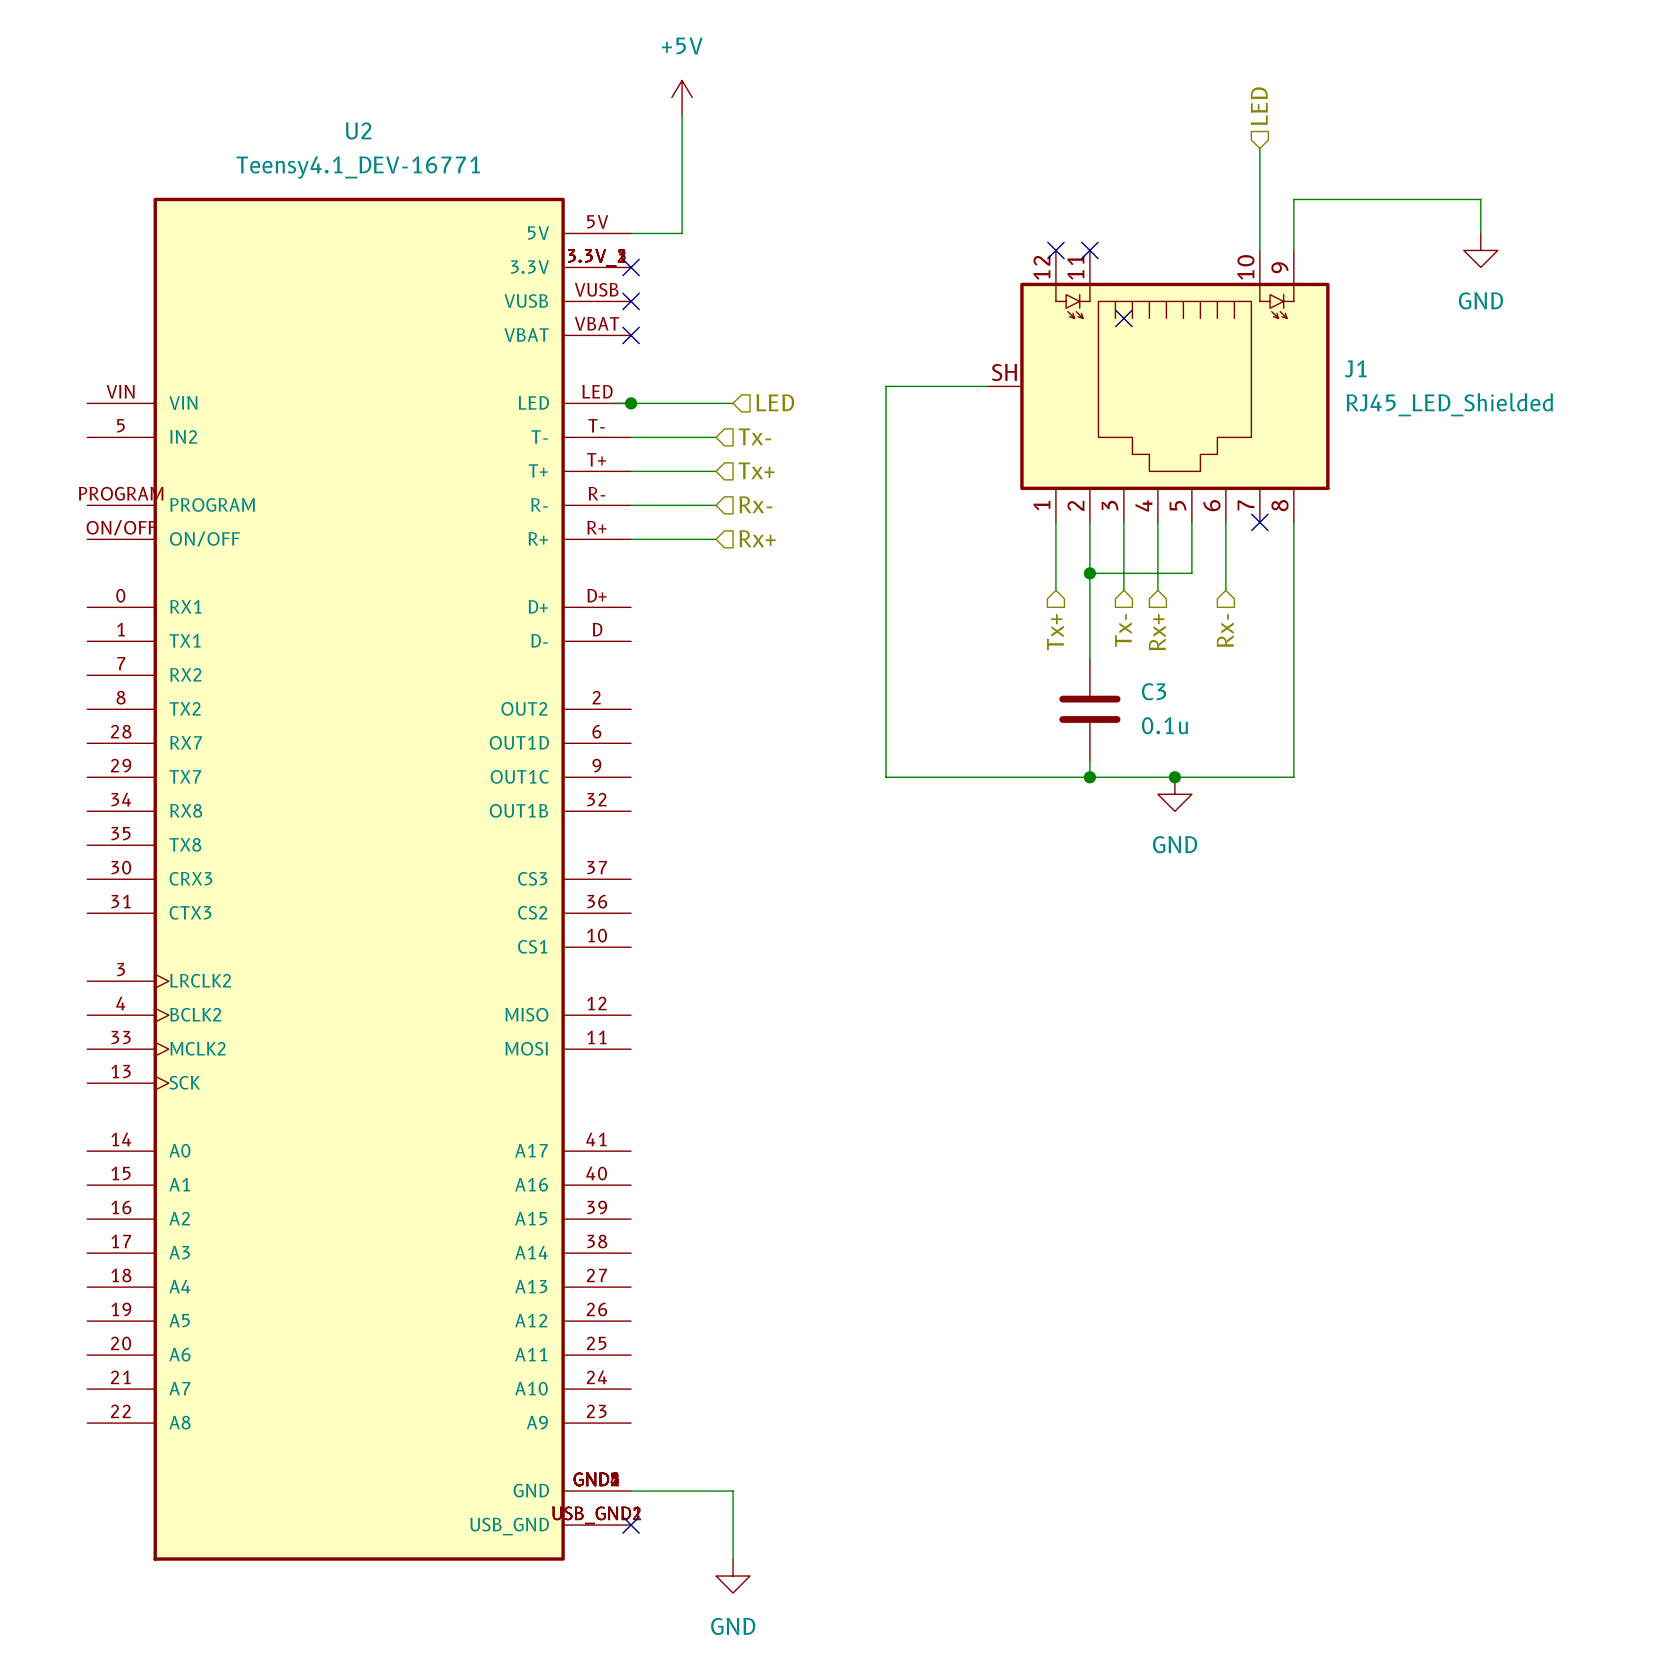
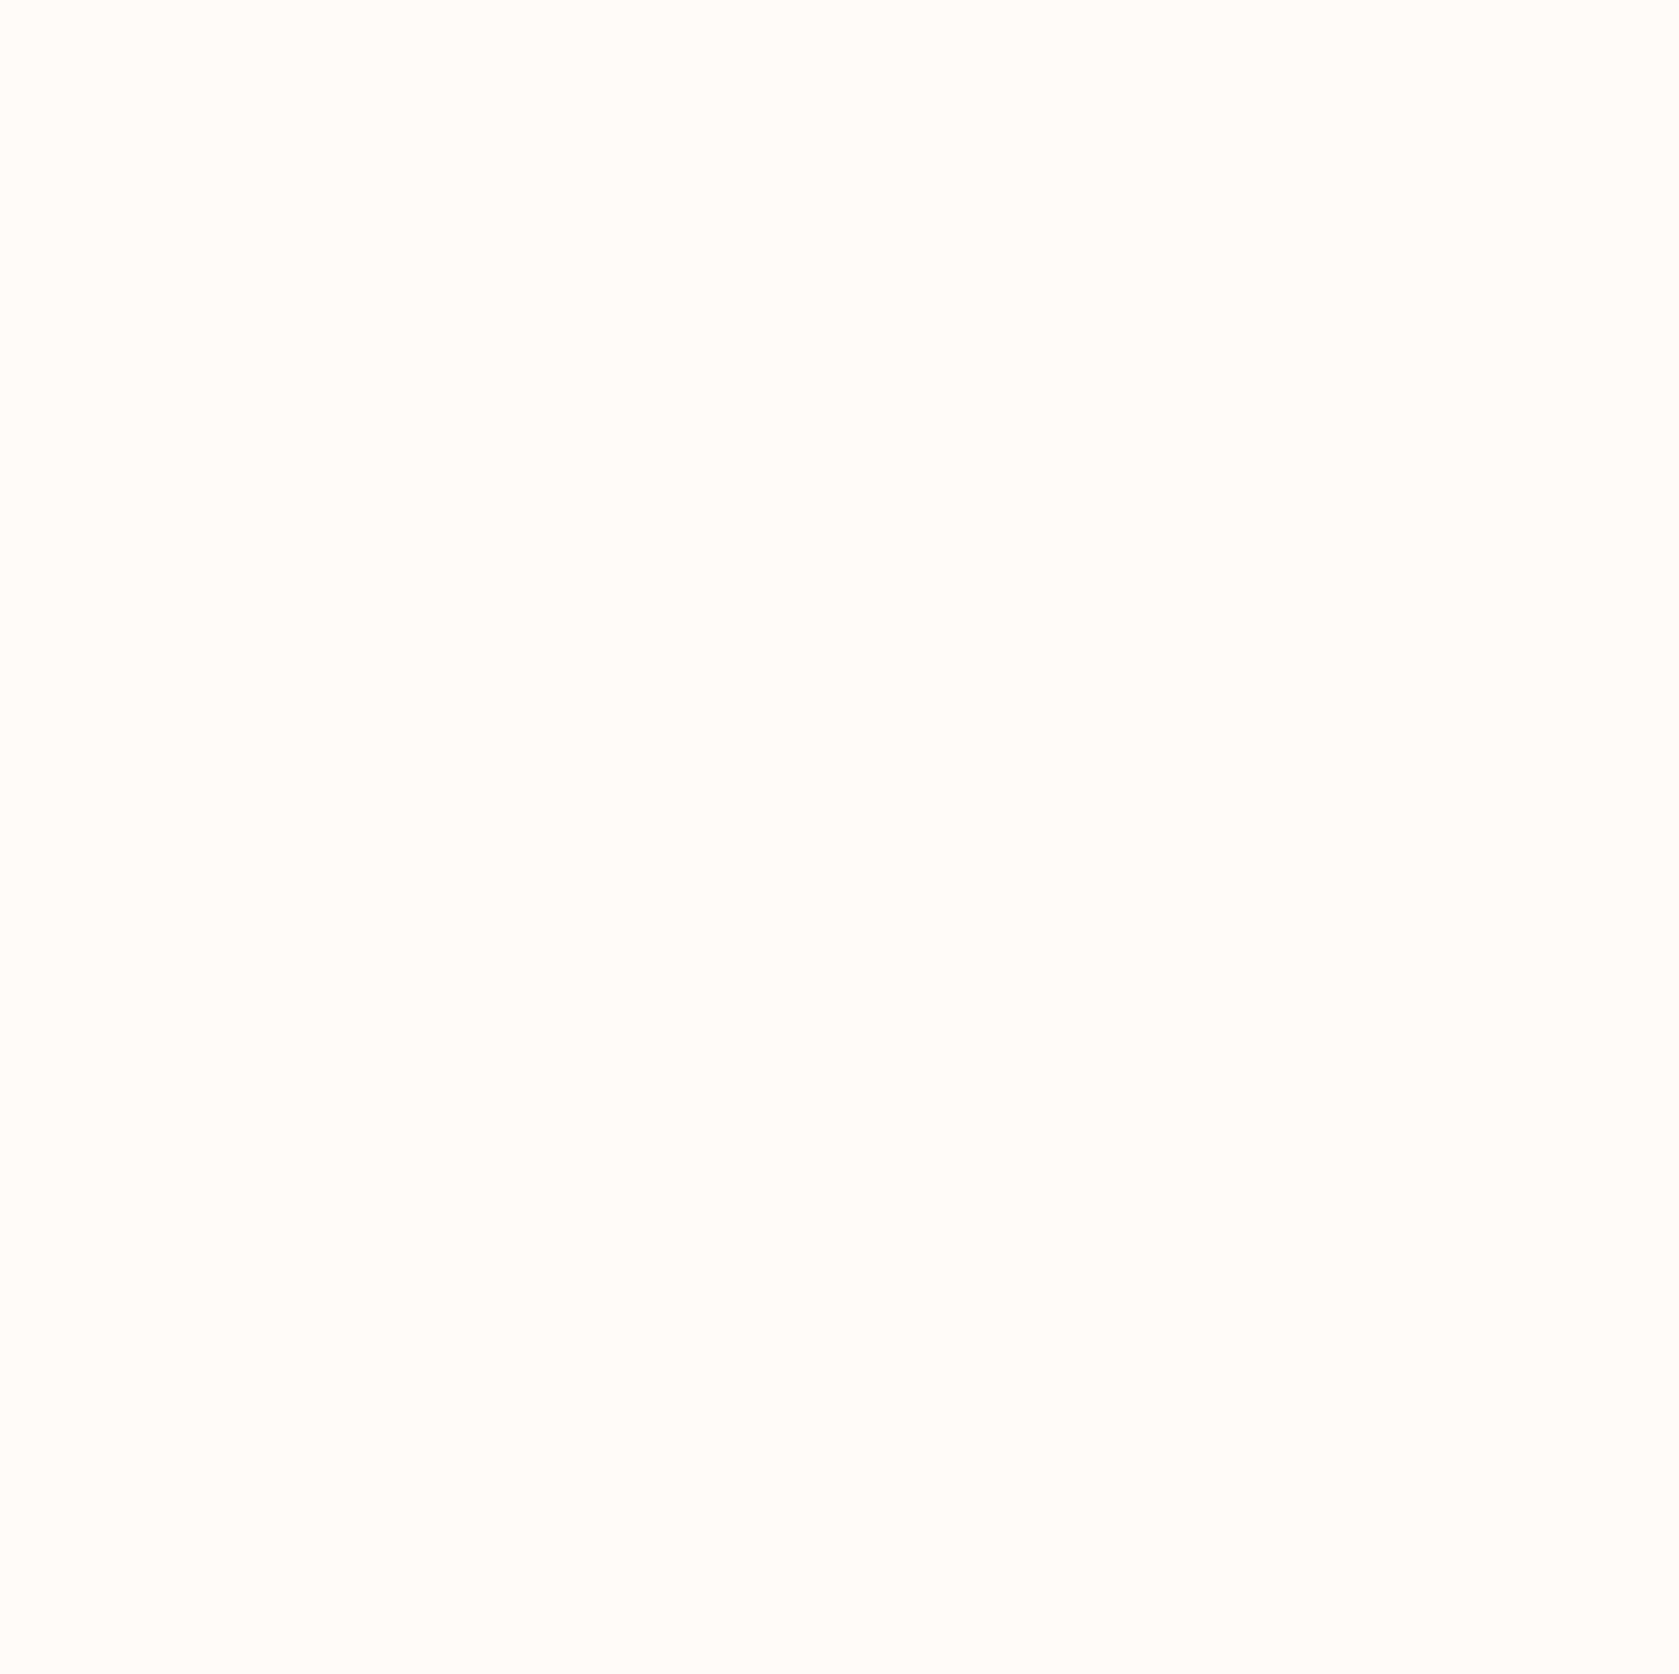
power symbol: +5V (682, 97) -> none
hierarchical label: LED (1259, 106) -> none
wire: (682, 114) (682, 233) (631, 233) -> none
wire: (1259, 148) (1259, 250) -> none
wire: (1480, 233) (1480, 199) (1293, 199) (1293, 250) -> none
no-connect mark: (1055, 250) -> none
no-connect mark: (1089, 250) -> none
power symbol: GND (1480, 250) -> none
no-connect mark: (631, 267) -> none
no-connect mark: (631, 301) -> none
no-connect mark: (1123, 318) -> none
no-connect mark: (631, 335) -> none
wire: (987, 386) (885, 386) (885, 777) (1293, 777) (1293, 522) -> none
J1: RJ45_LED_Shielded (1158, 386) -> none
hierarchical label: LED (775, 402) -> none
wire: (614, 403) (733, 403) -> none
junction: (631, 403) -> none
hierarchical label: Tx- (754, 436) -> none
wire: (631, 437) (716, 437) -> none
hierarchical label: Tx+ (756, 470) -> none
wire: (631, 471) (716, 471) -> none
hierarchical label: Rx- (755, 504) -> none
wire: (631, 505) (716, 505) -> none
wire: (1055, 522) (1055, 590) -> none
wire: (1089, 522) (1089, 658) -> none
wire: (1123, 522) (1123, 590) -> none
wire: (1157, 522) (1157, 590) -> none
wire: (1191, 522) (1191, 573) (1089, 573) -> none
wire: (1225, 522) (1225, 590) -> none
no-connect mark: (1259, 522) -> none
hierarchical label: Rx+ (757, 538) -> none
wire: (631, 539) (716, 539) -> none
junction: (1089, 573) -> none
hierarchical label: Tx- (1123, 630) -> none
hierarchical label: Rx- (1225, 630) -> none
hierarchical label: Tx+ (1055, 632) -> none
hierarchical label: Rx+ (1157, 632) -> none
C3: 0.1u (1089, 709) -> none
wire: (1089, 760) (1089, 777) -> none
junction: (1089, 777) -> none
junction: (1174, 777) -> none
power symbol: GND (1174, 794) -> none
U2: Teensy4.1_DEV-16771 (359, 879) -> none
wire: (631, 1491) (733, 1491) (733, 1559) -> none
no-connect mark: (631, 1525) -> none
power symbol: GND (733, 1576) -> none

